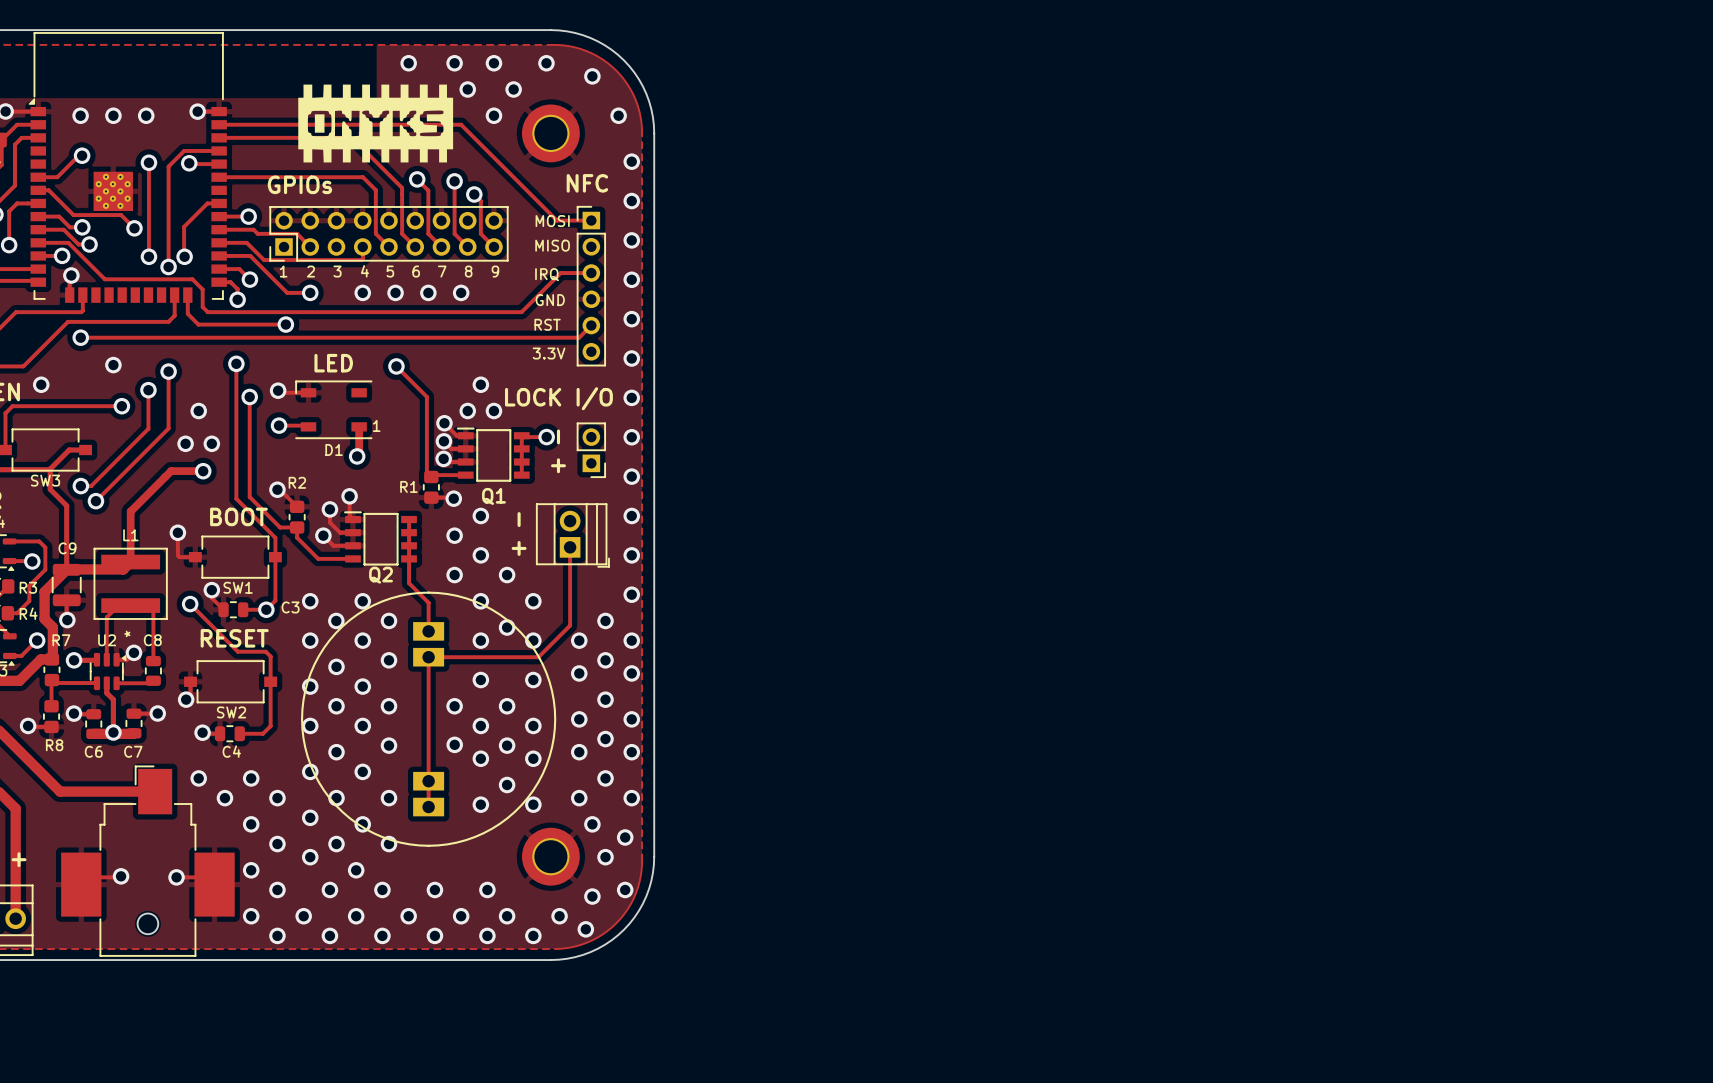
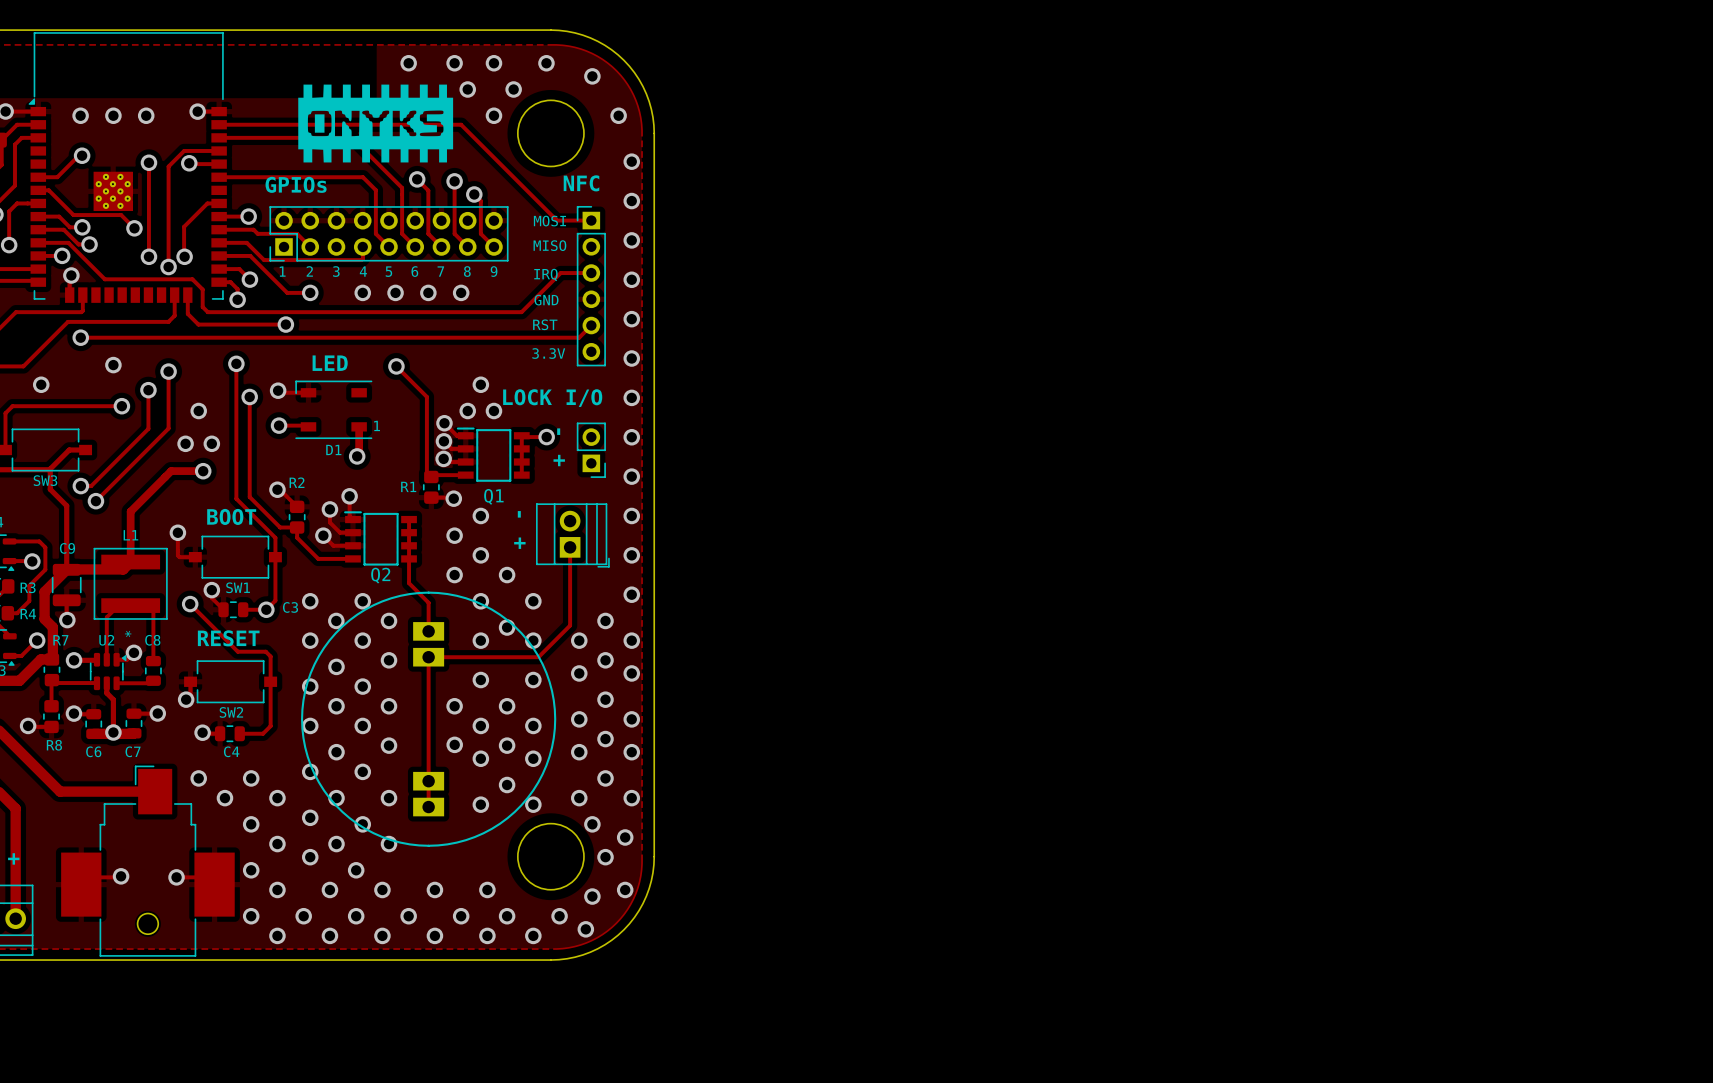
round board edge: none -> [517, 100, 585, 167]
part: (550, 133) -> none
round board edge: none -> [517, 823, 585, 891]
part: (550, 856) -> none

